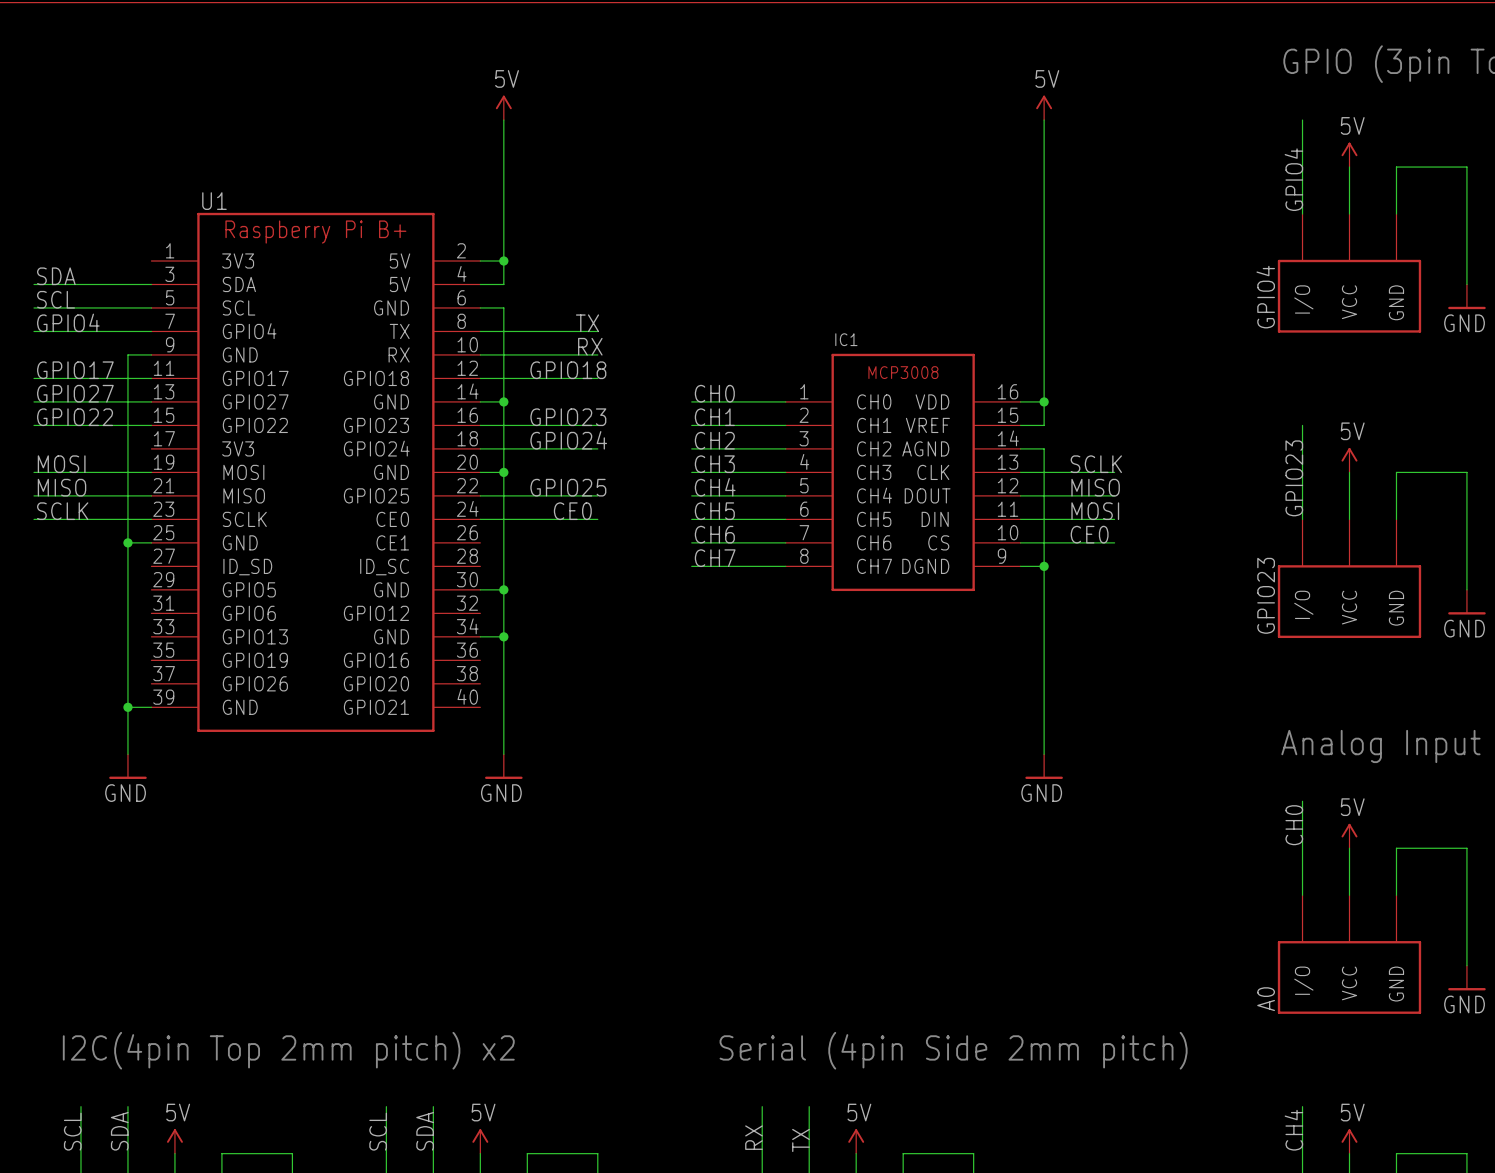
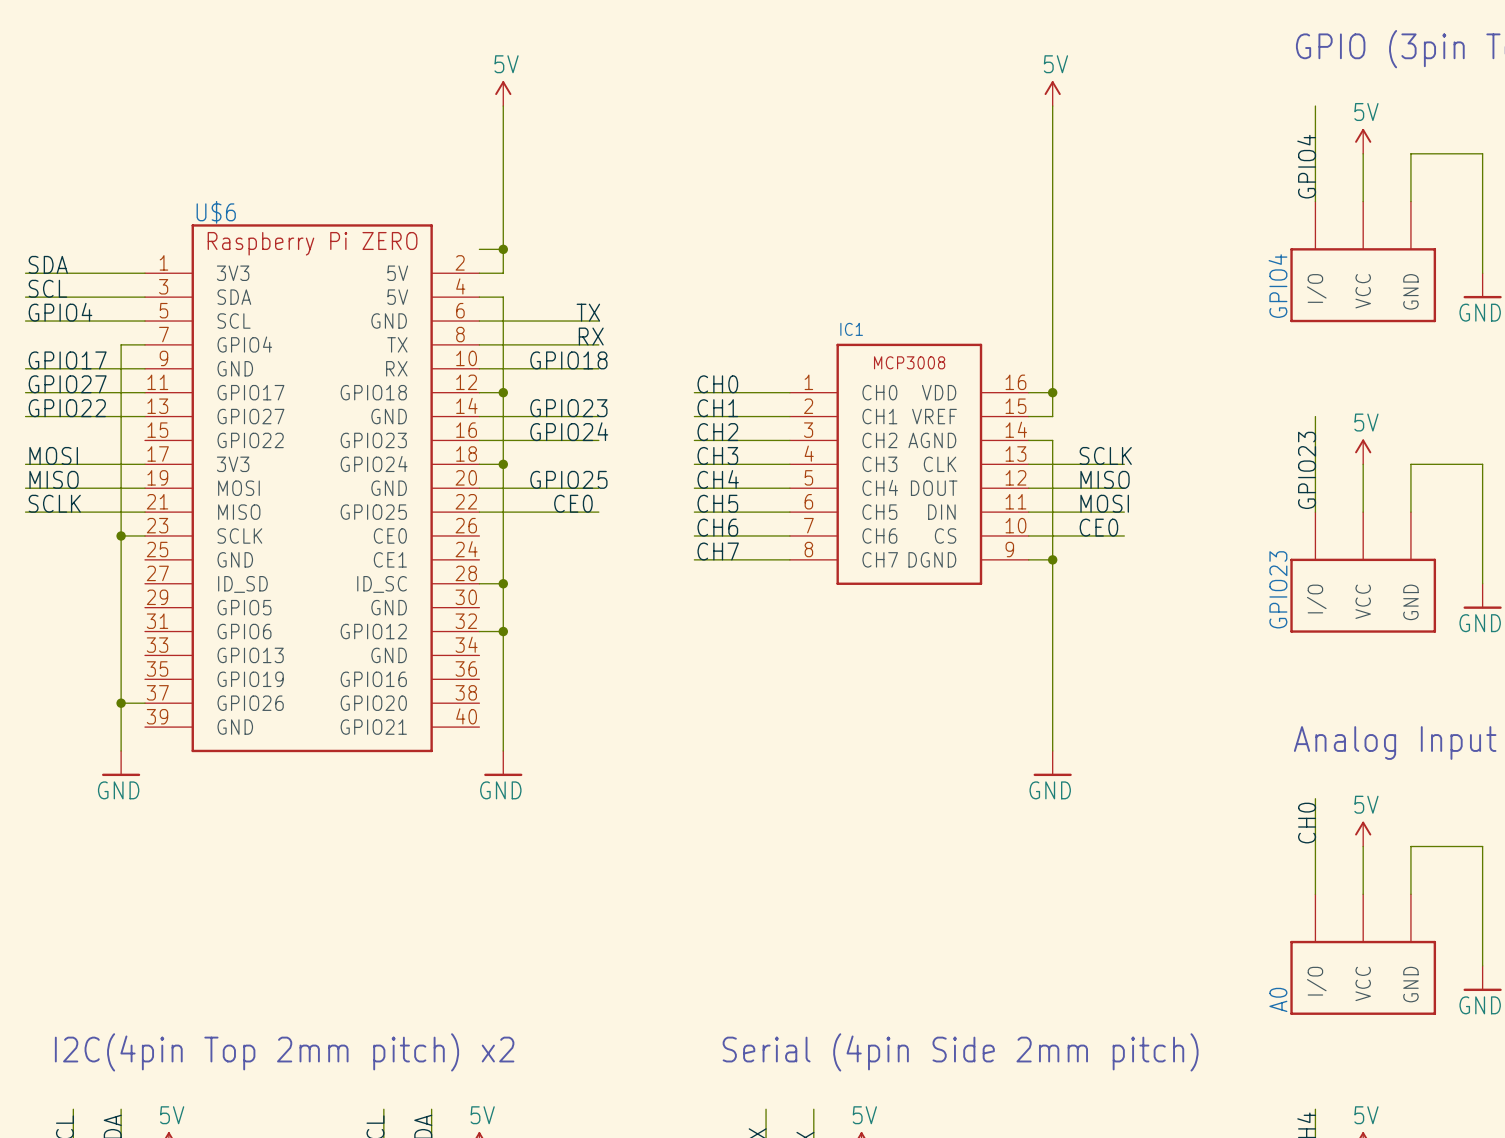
U1: (315, 472) -> none
U$6: none -> (312, 488)

